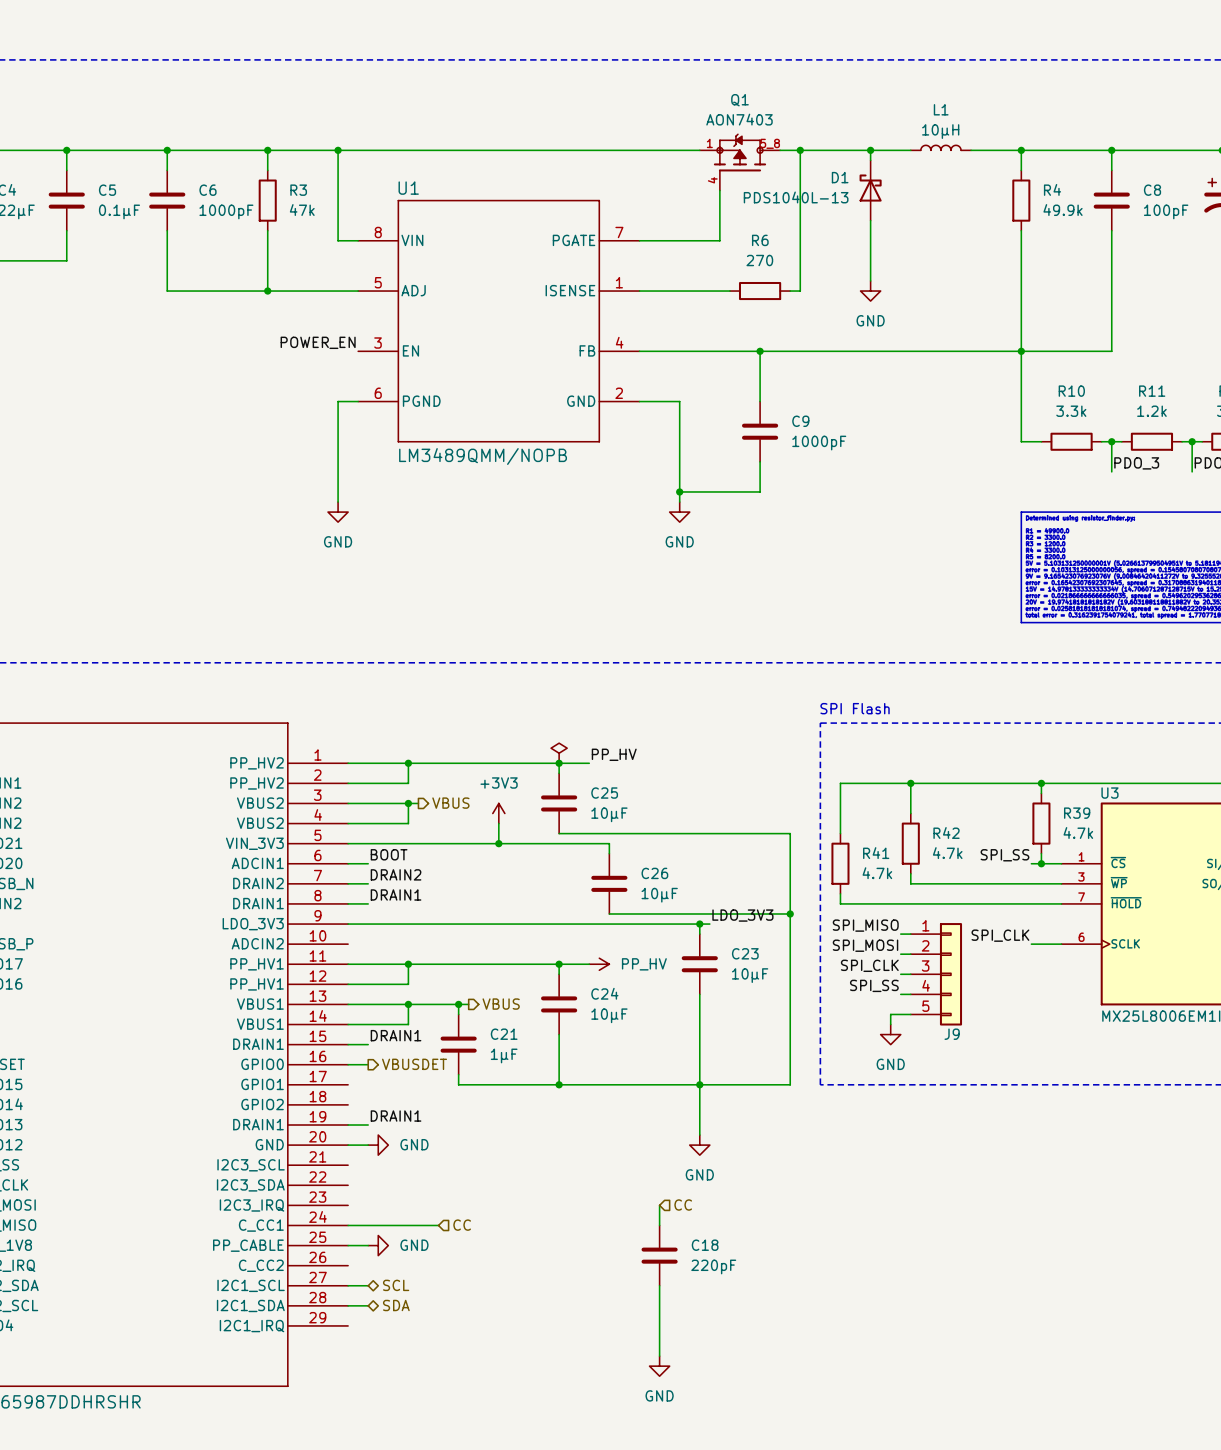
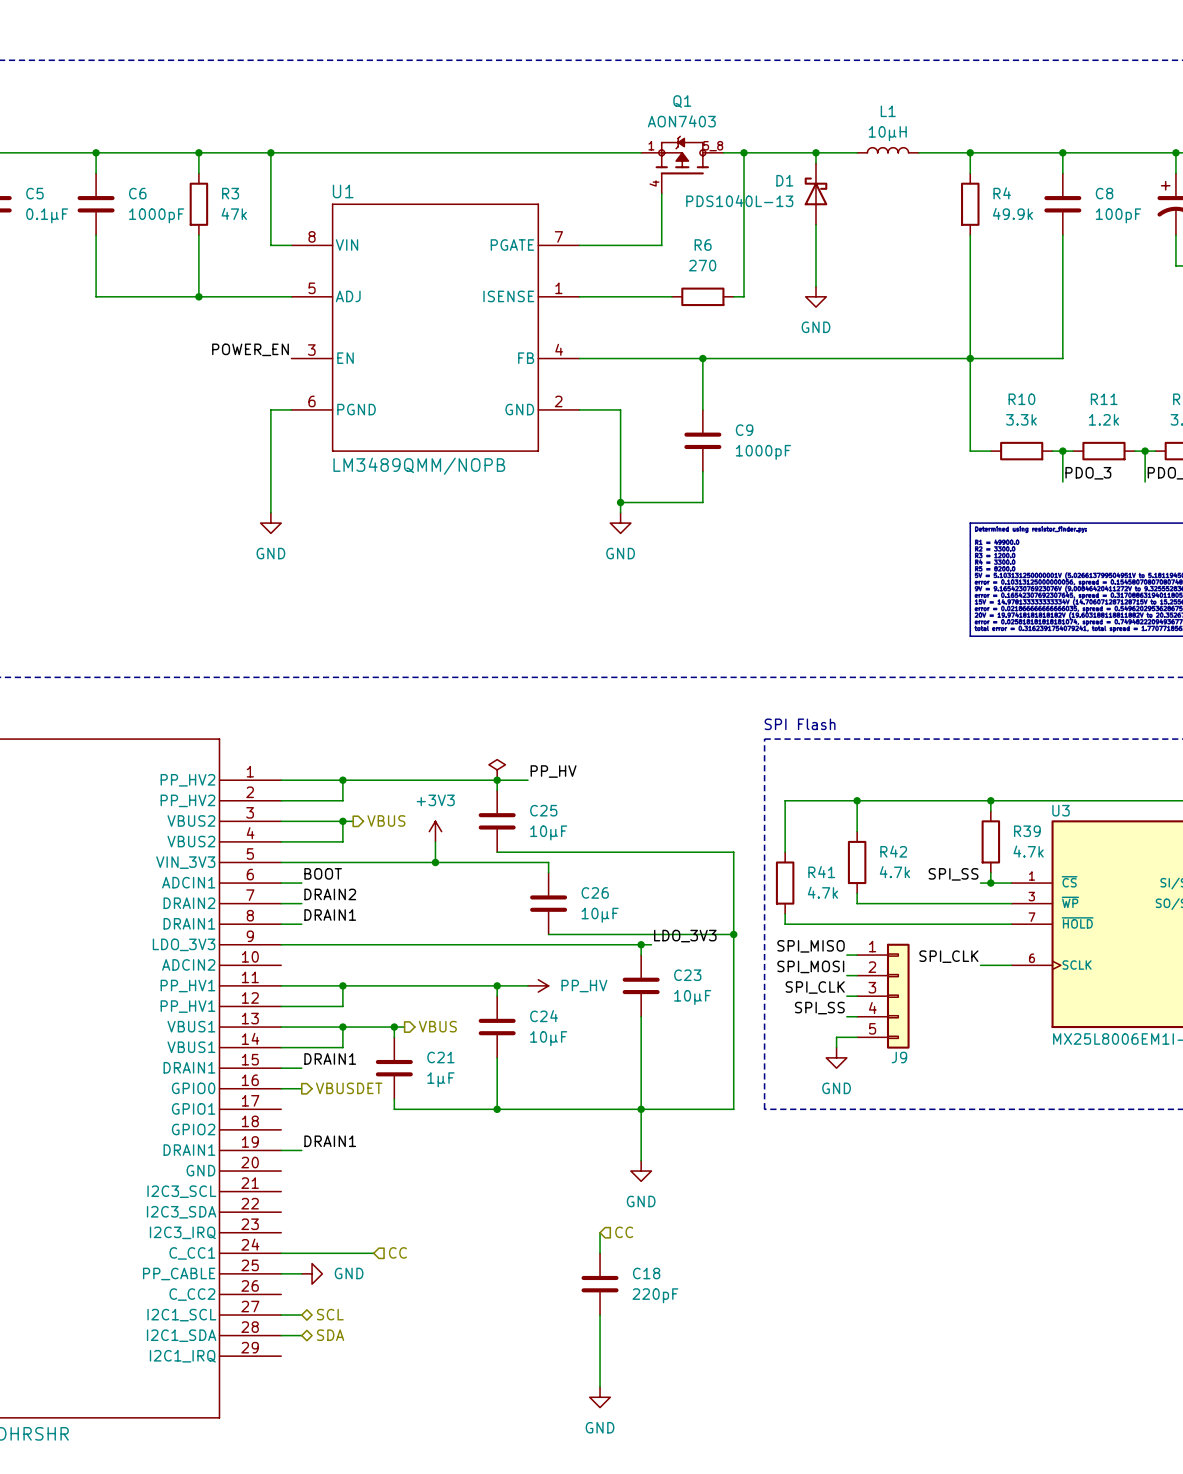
wire: (348, 1145) (368, 1145) -> none
power symbol: GND (378, 1145) -> none

